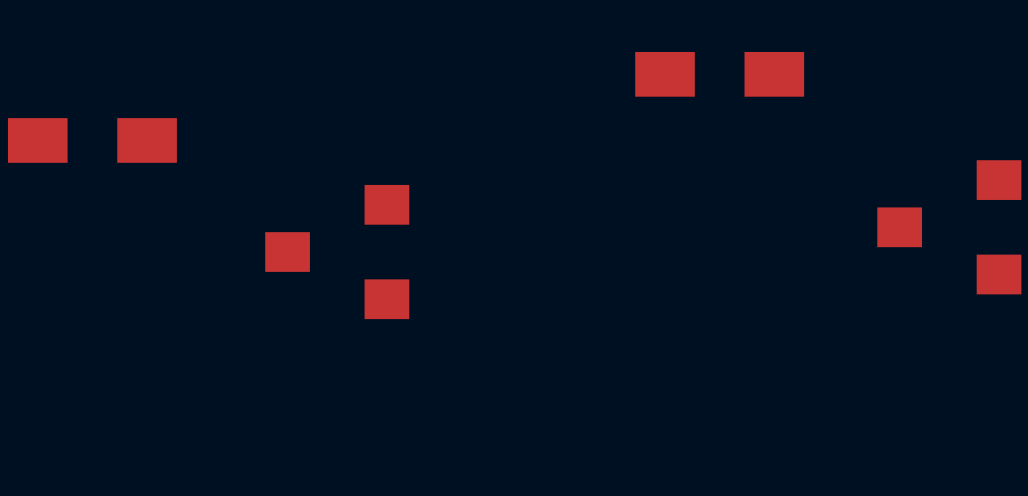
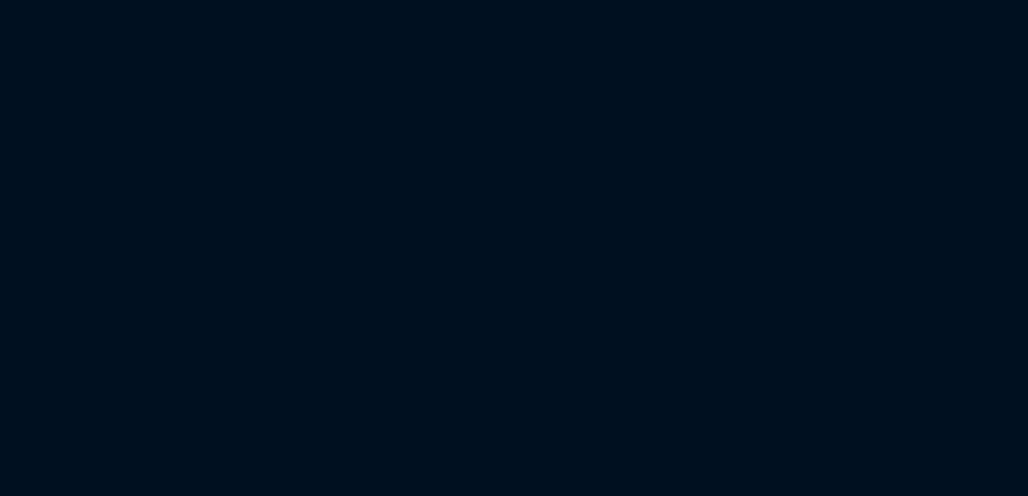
part: (719, 74) -> none
part: (92, 140) -> none
part: (949, 227) -> none
part: (337, 252) -> none

